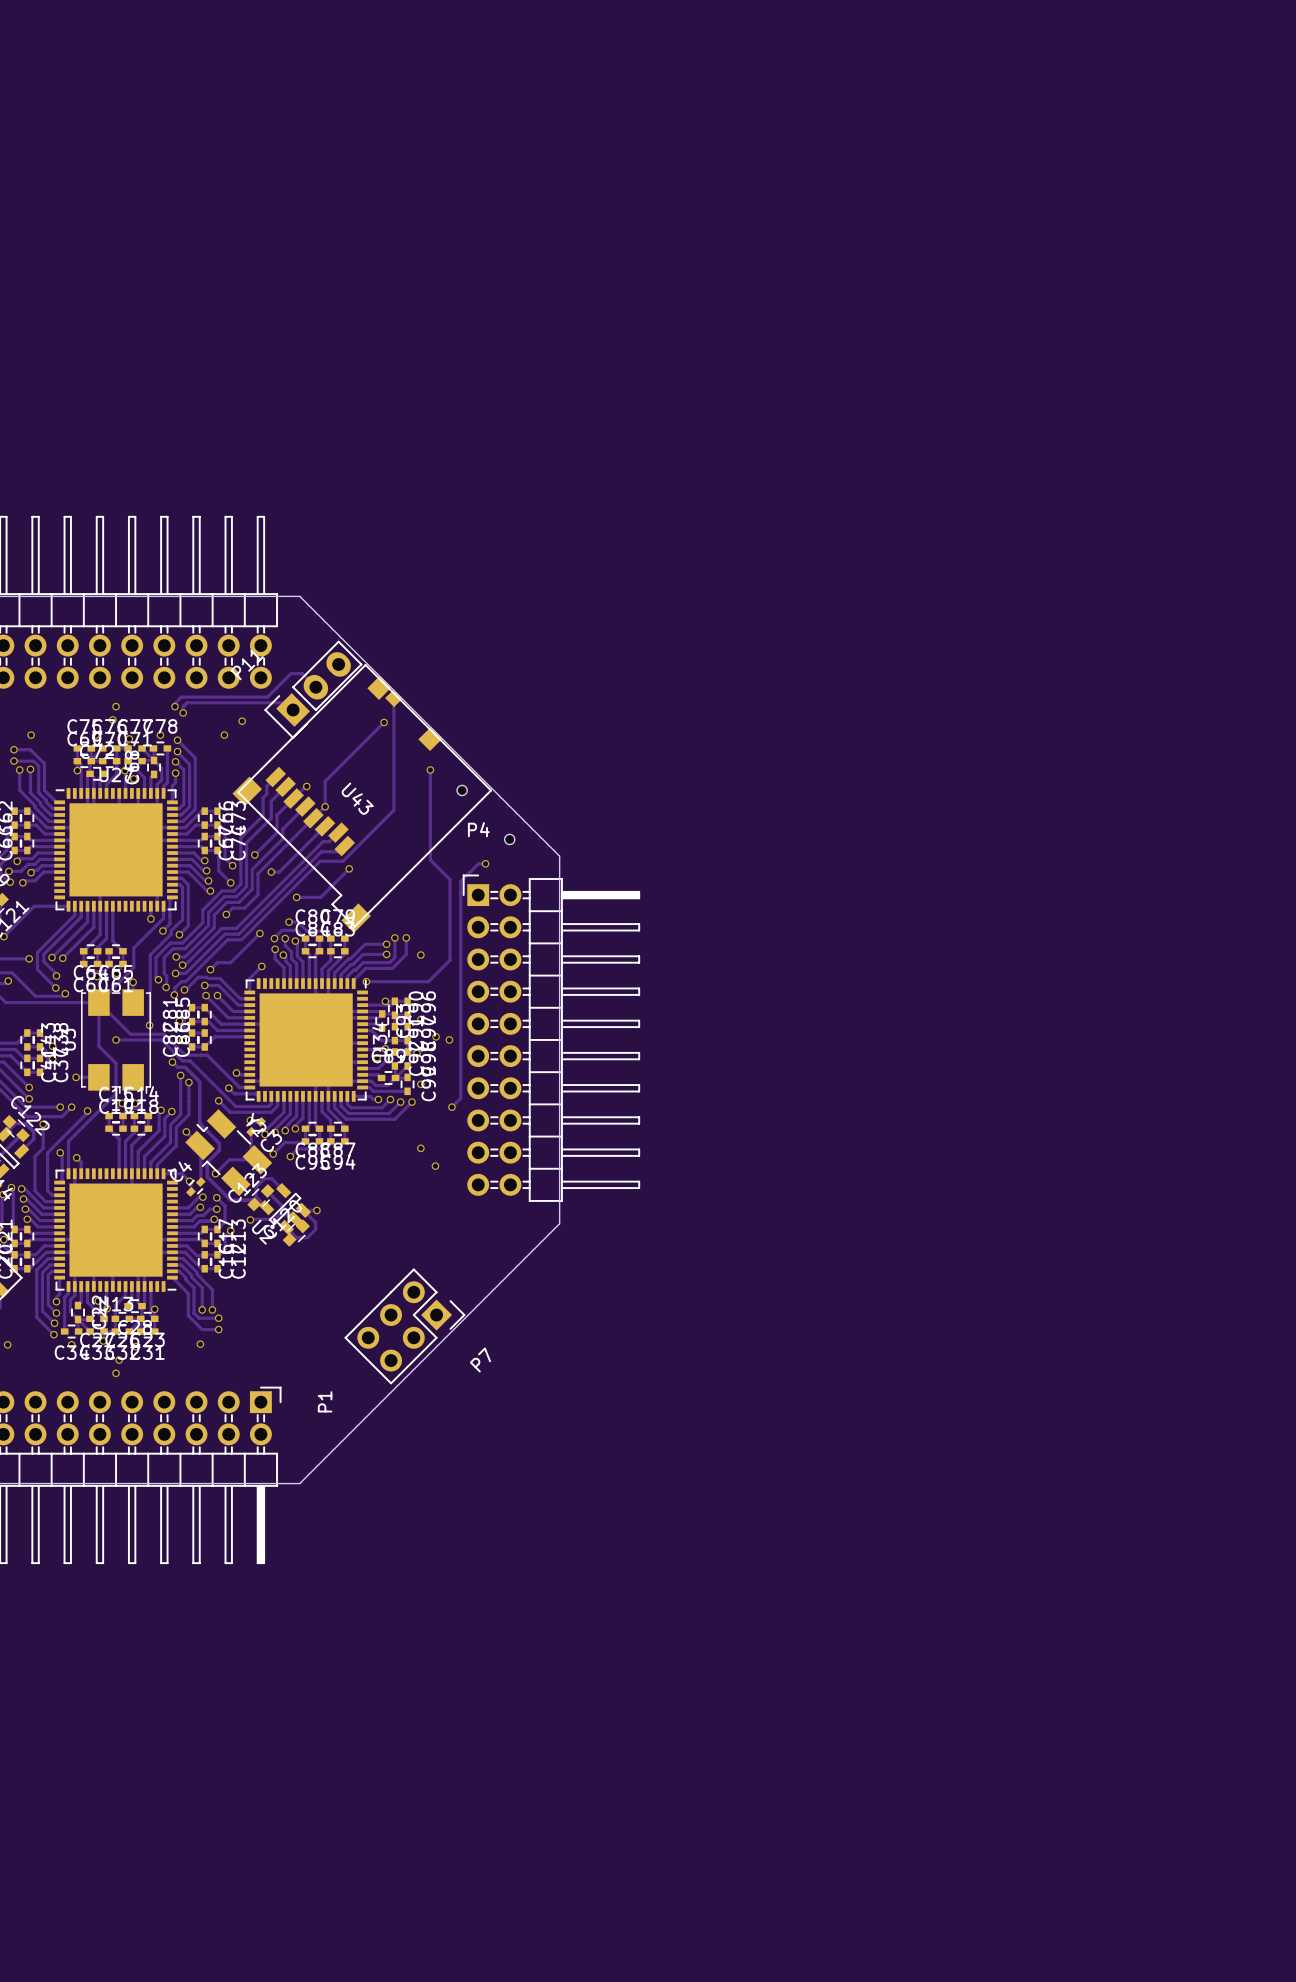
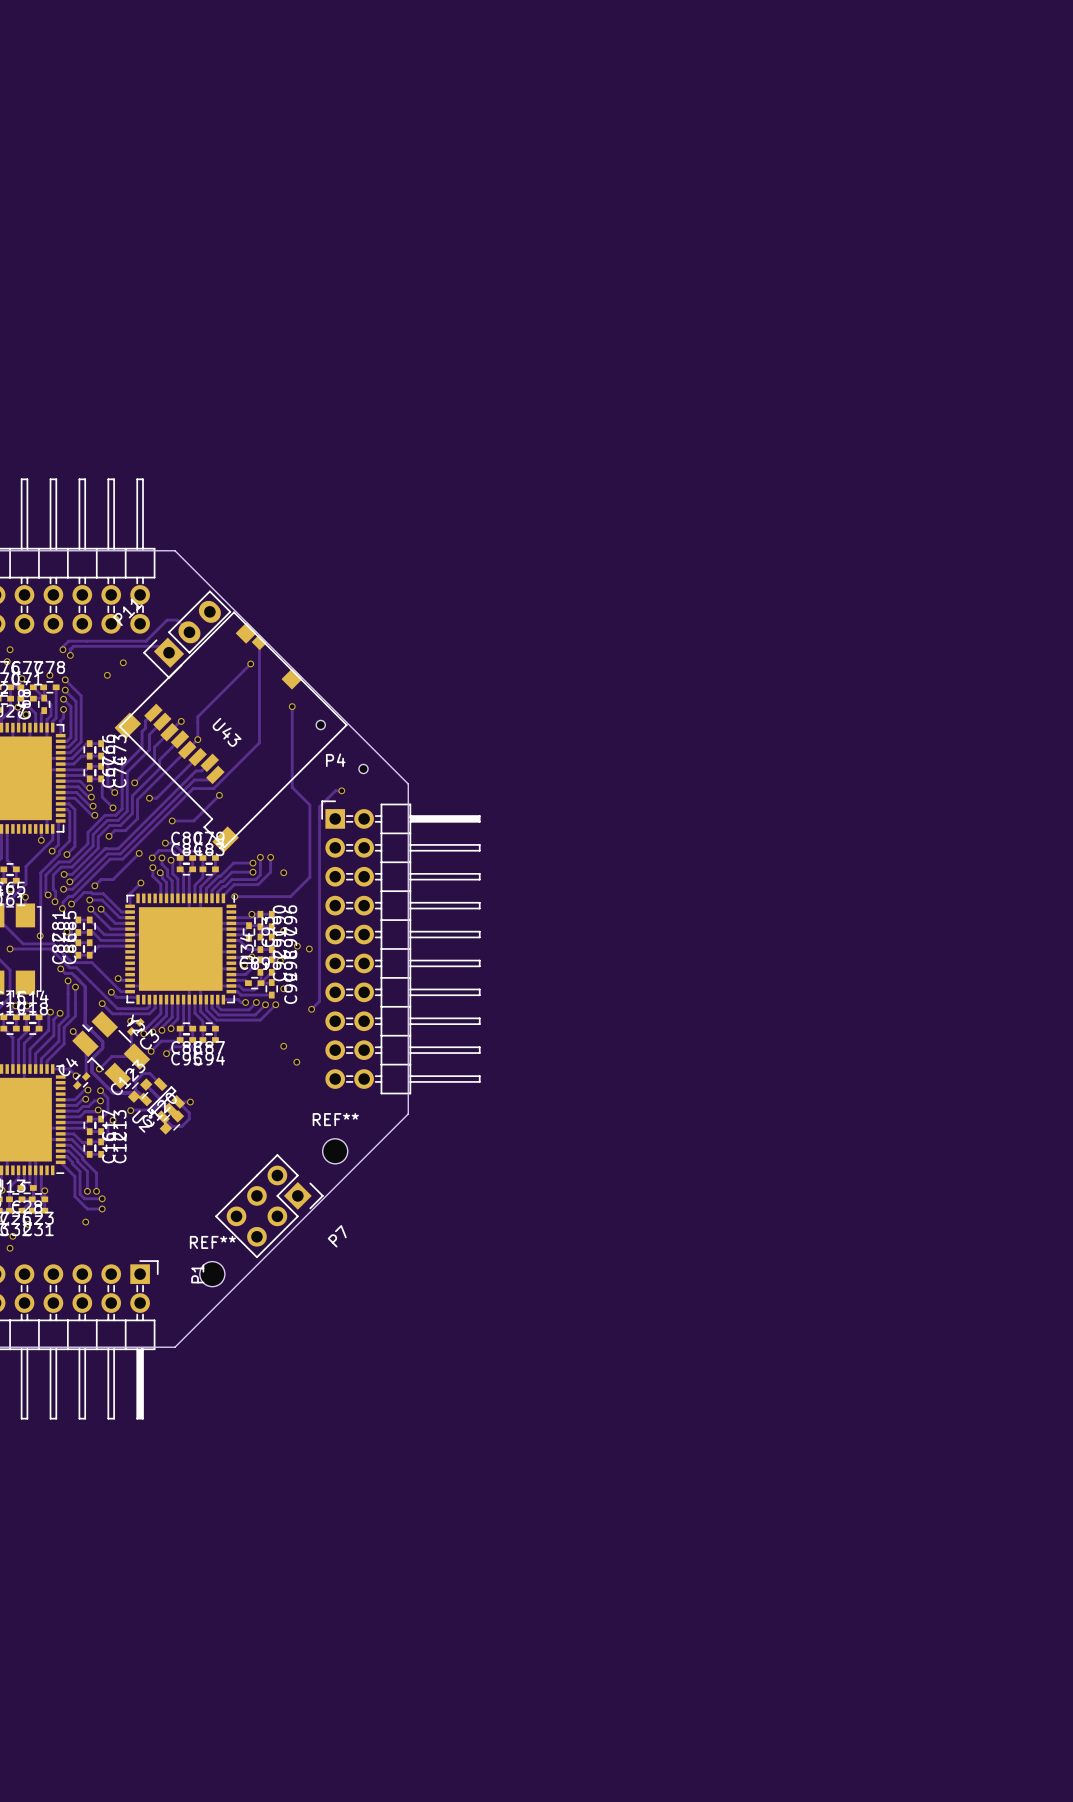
REF**: none -> (335, 1151)
REF**: none -> (212, 1274)

